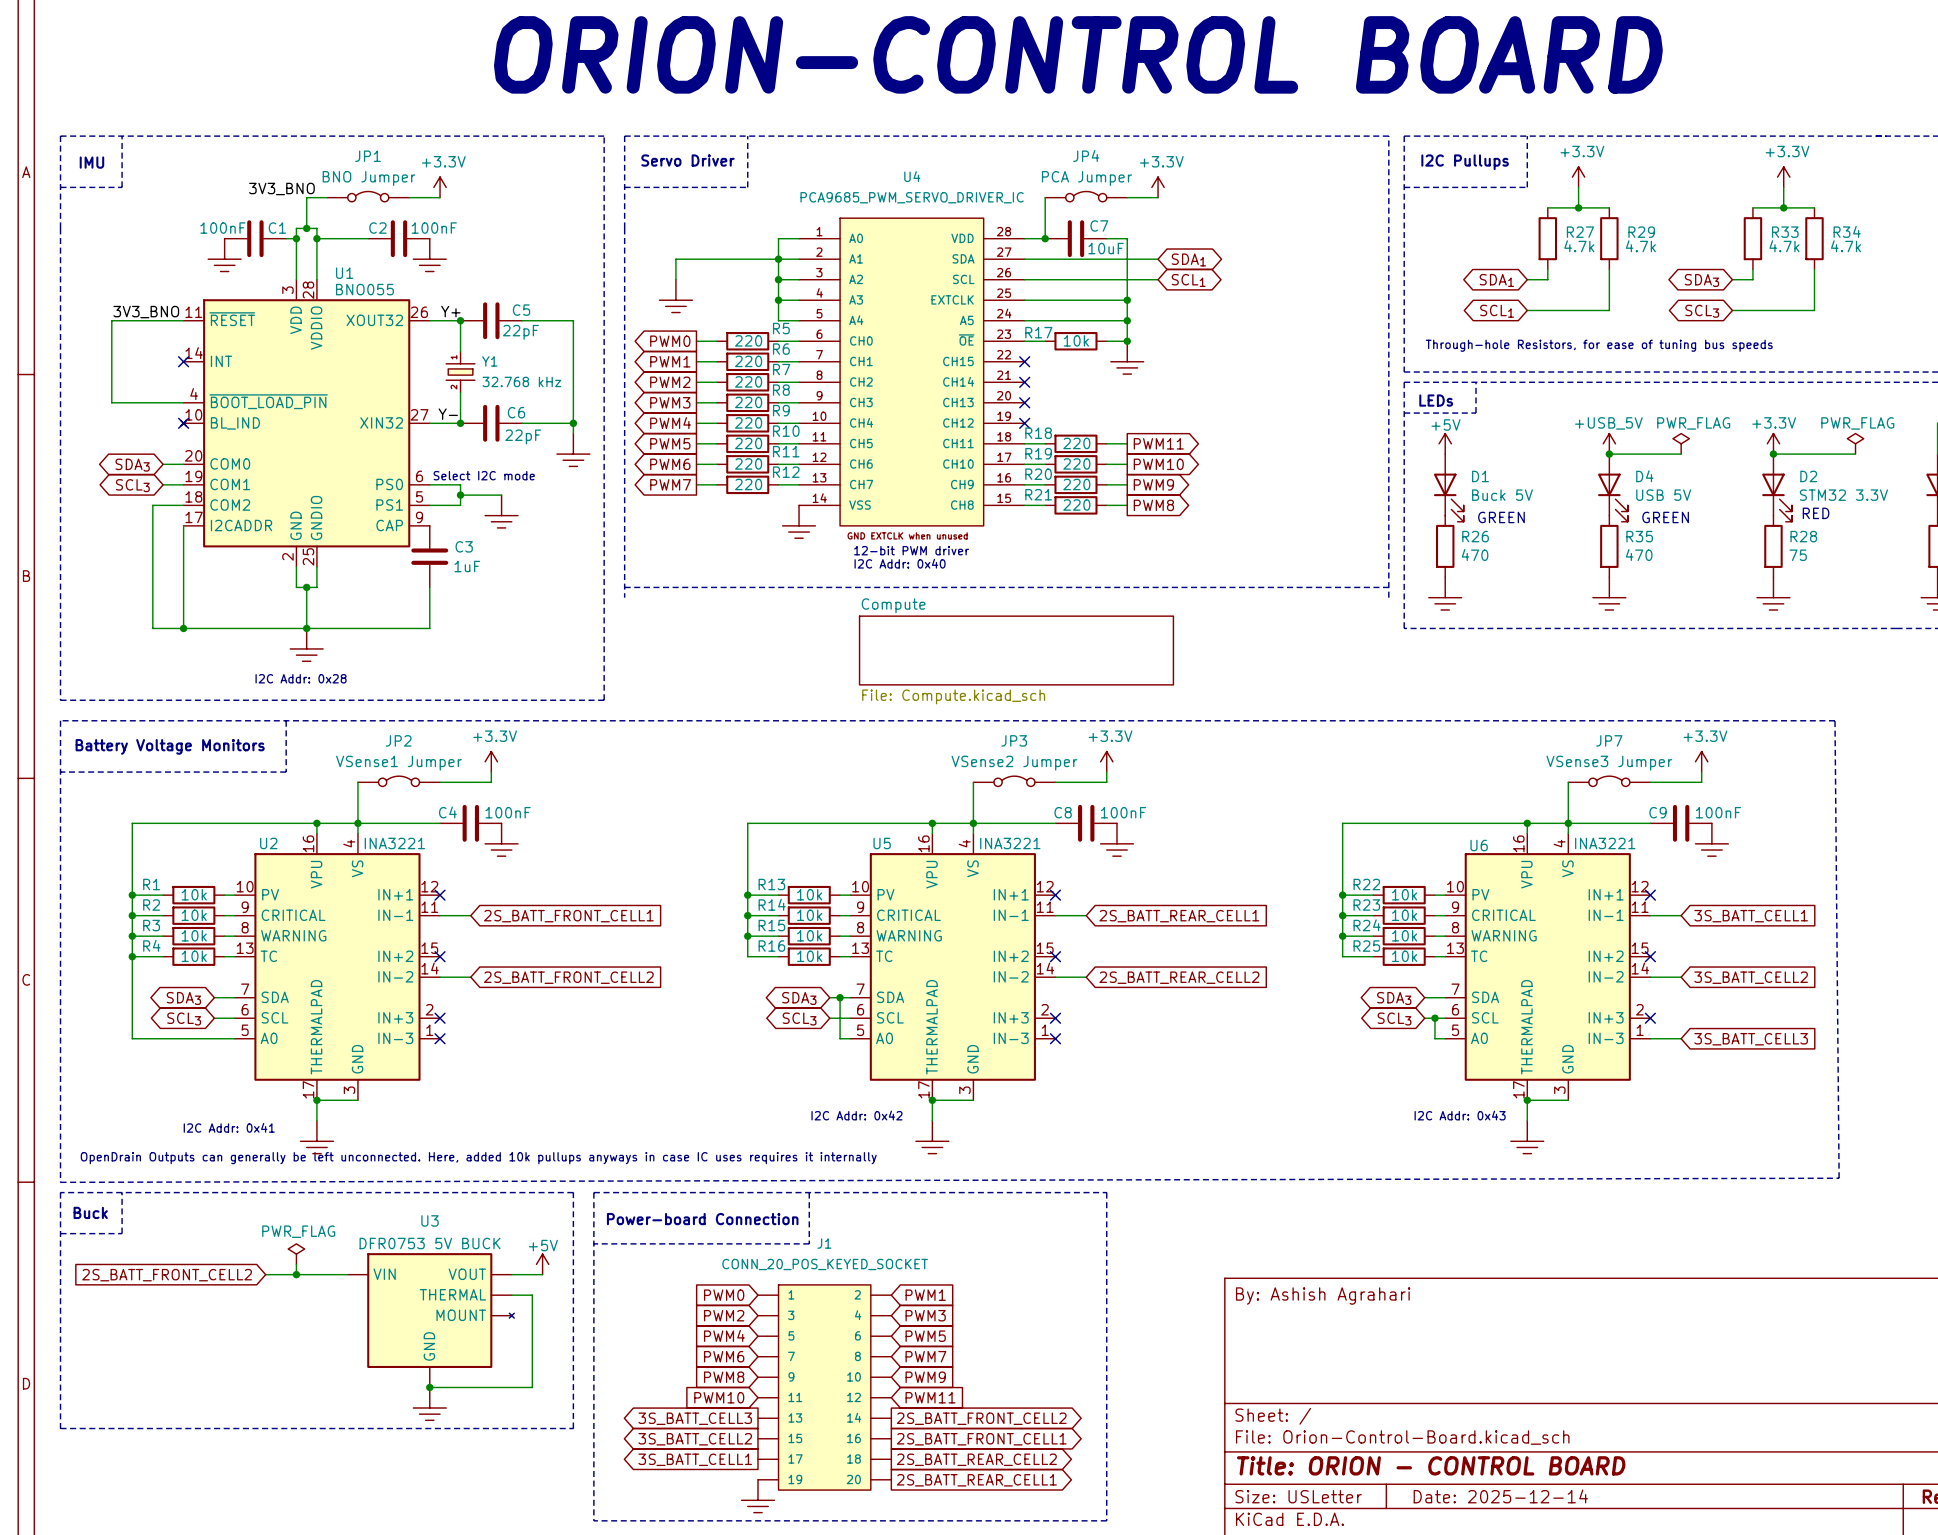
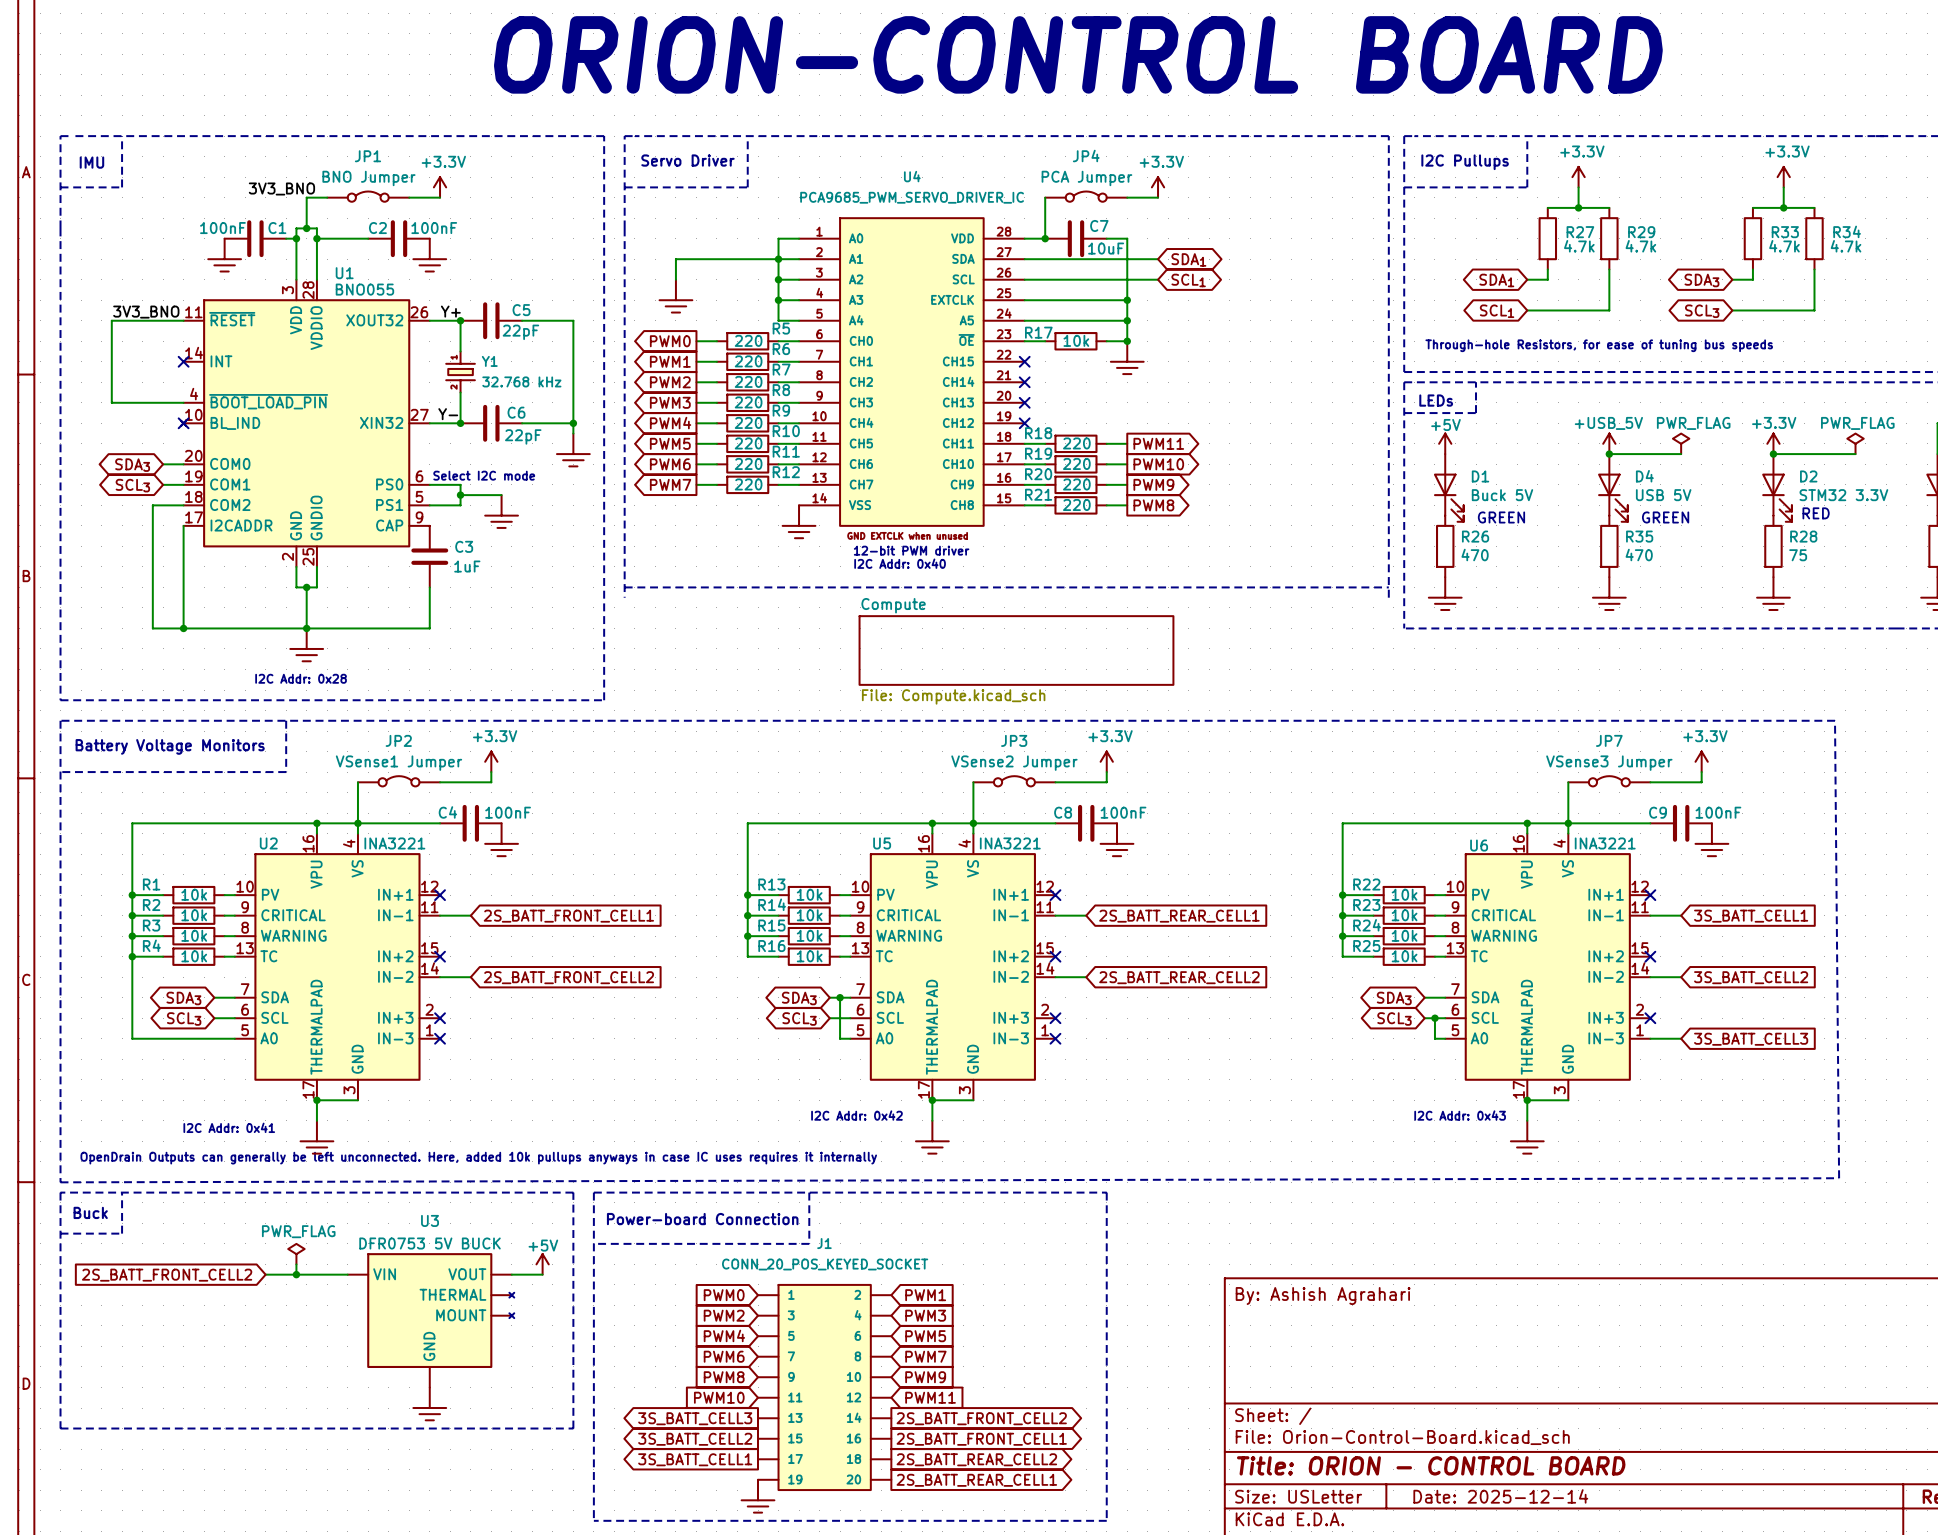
U3 symbol: [347, 1253, 515, 1388] -> [347, 1253, 515, 1388]
wire: (511, 1295) (532, 1295) (532, 1387) (429, 1387) -> none
junction: (429, 1387) -> none

